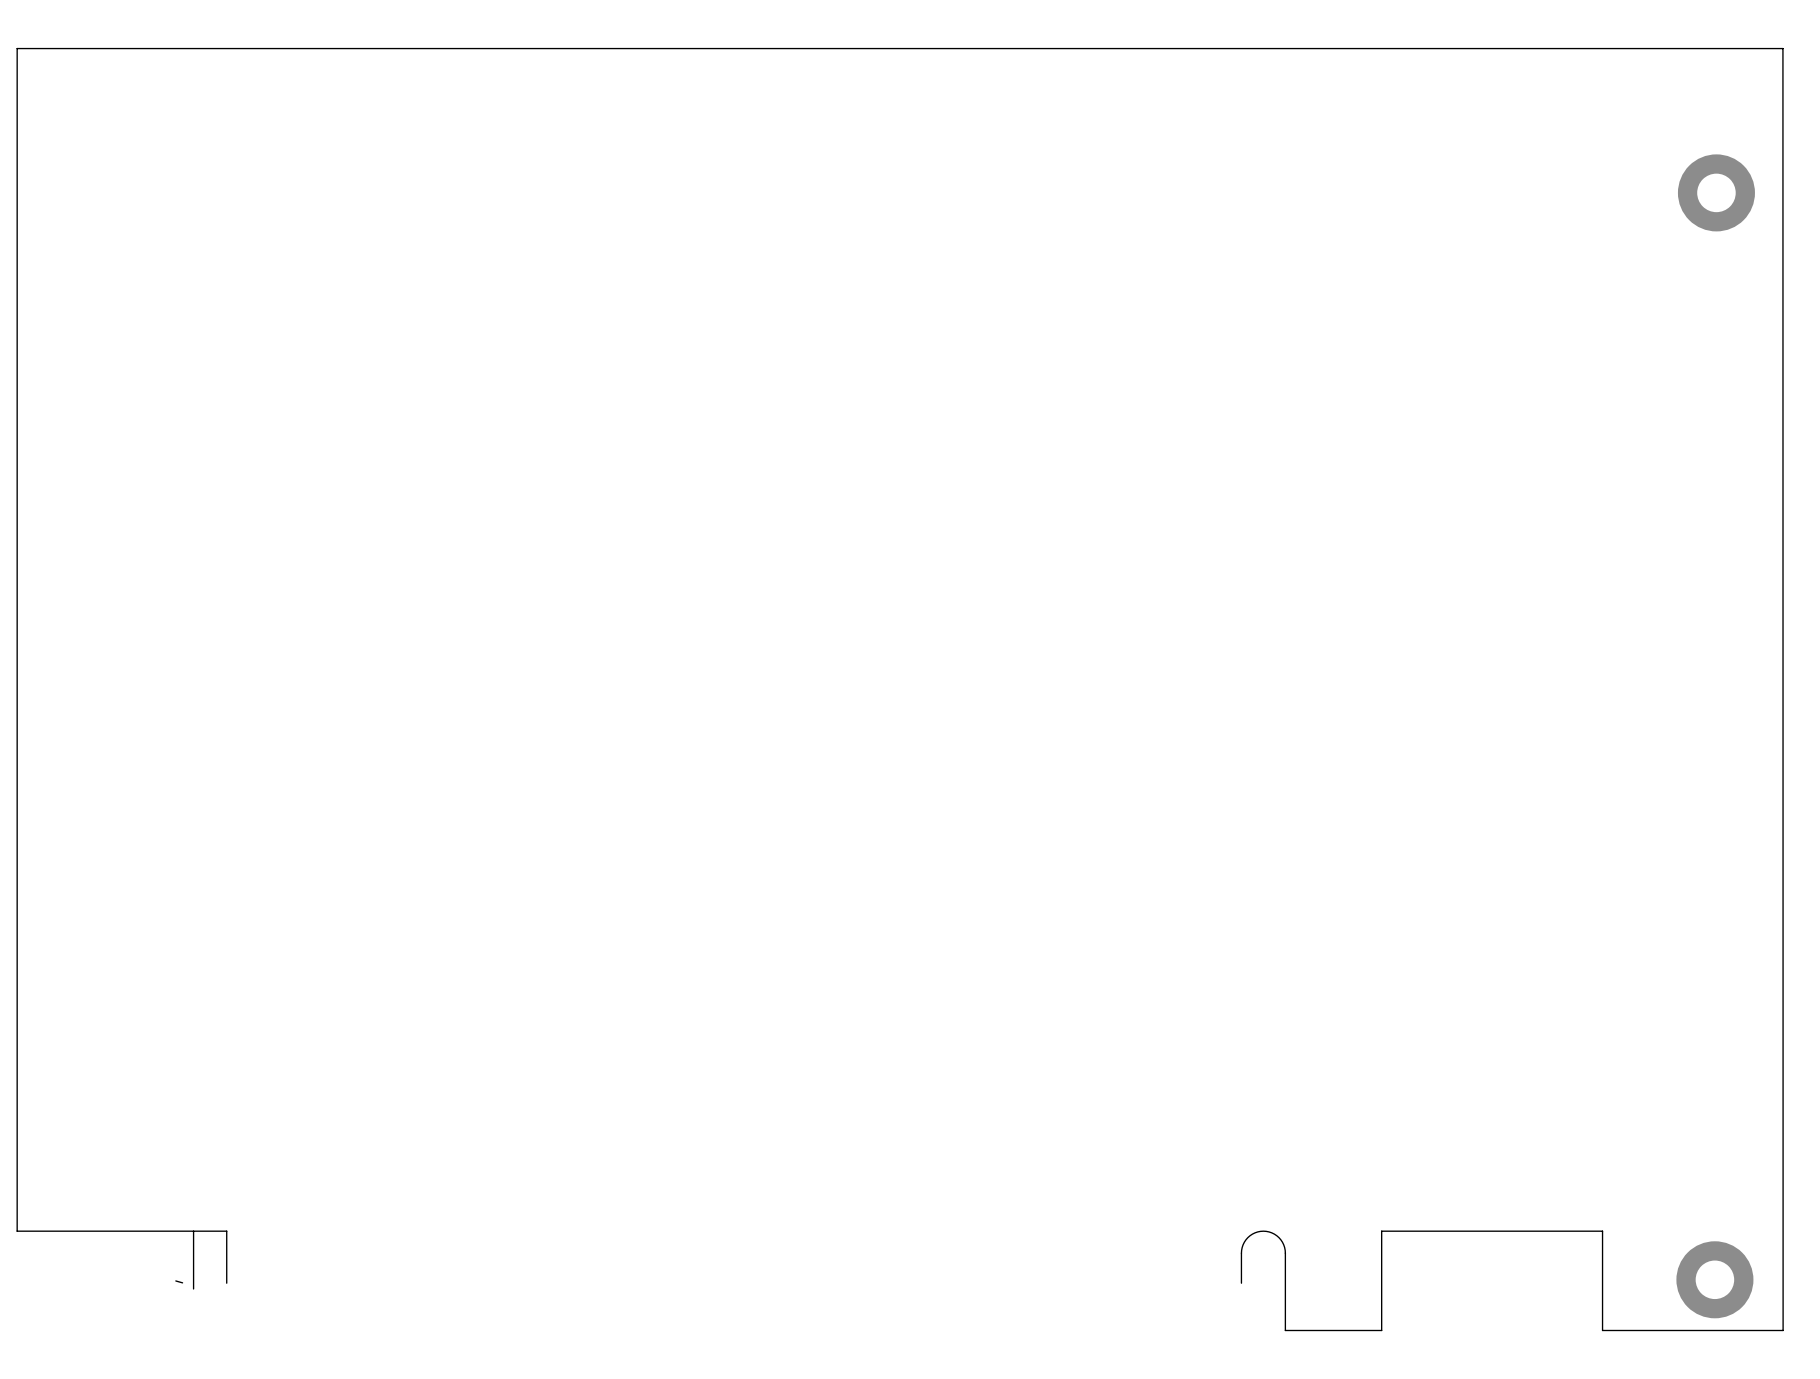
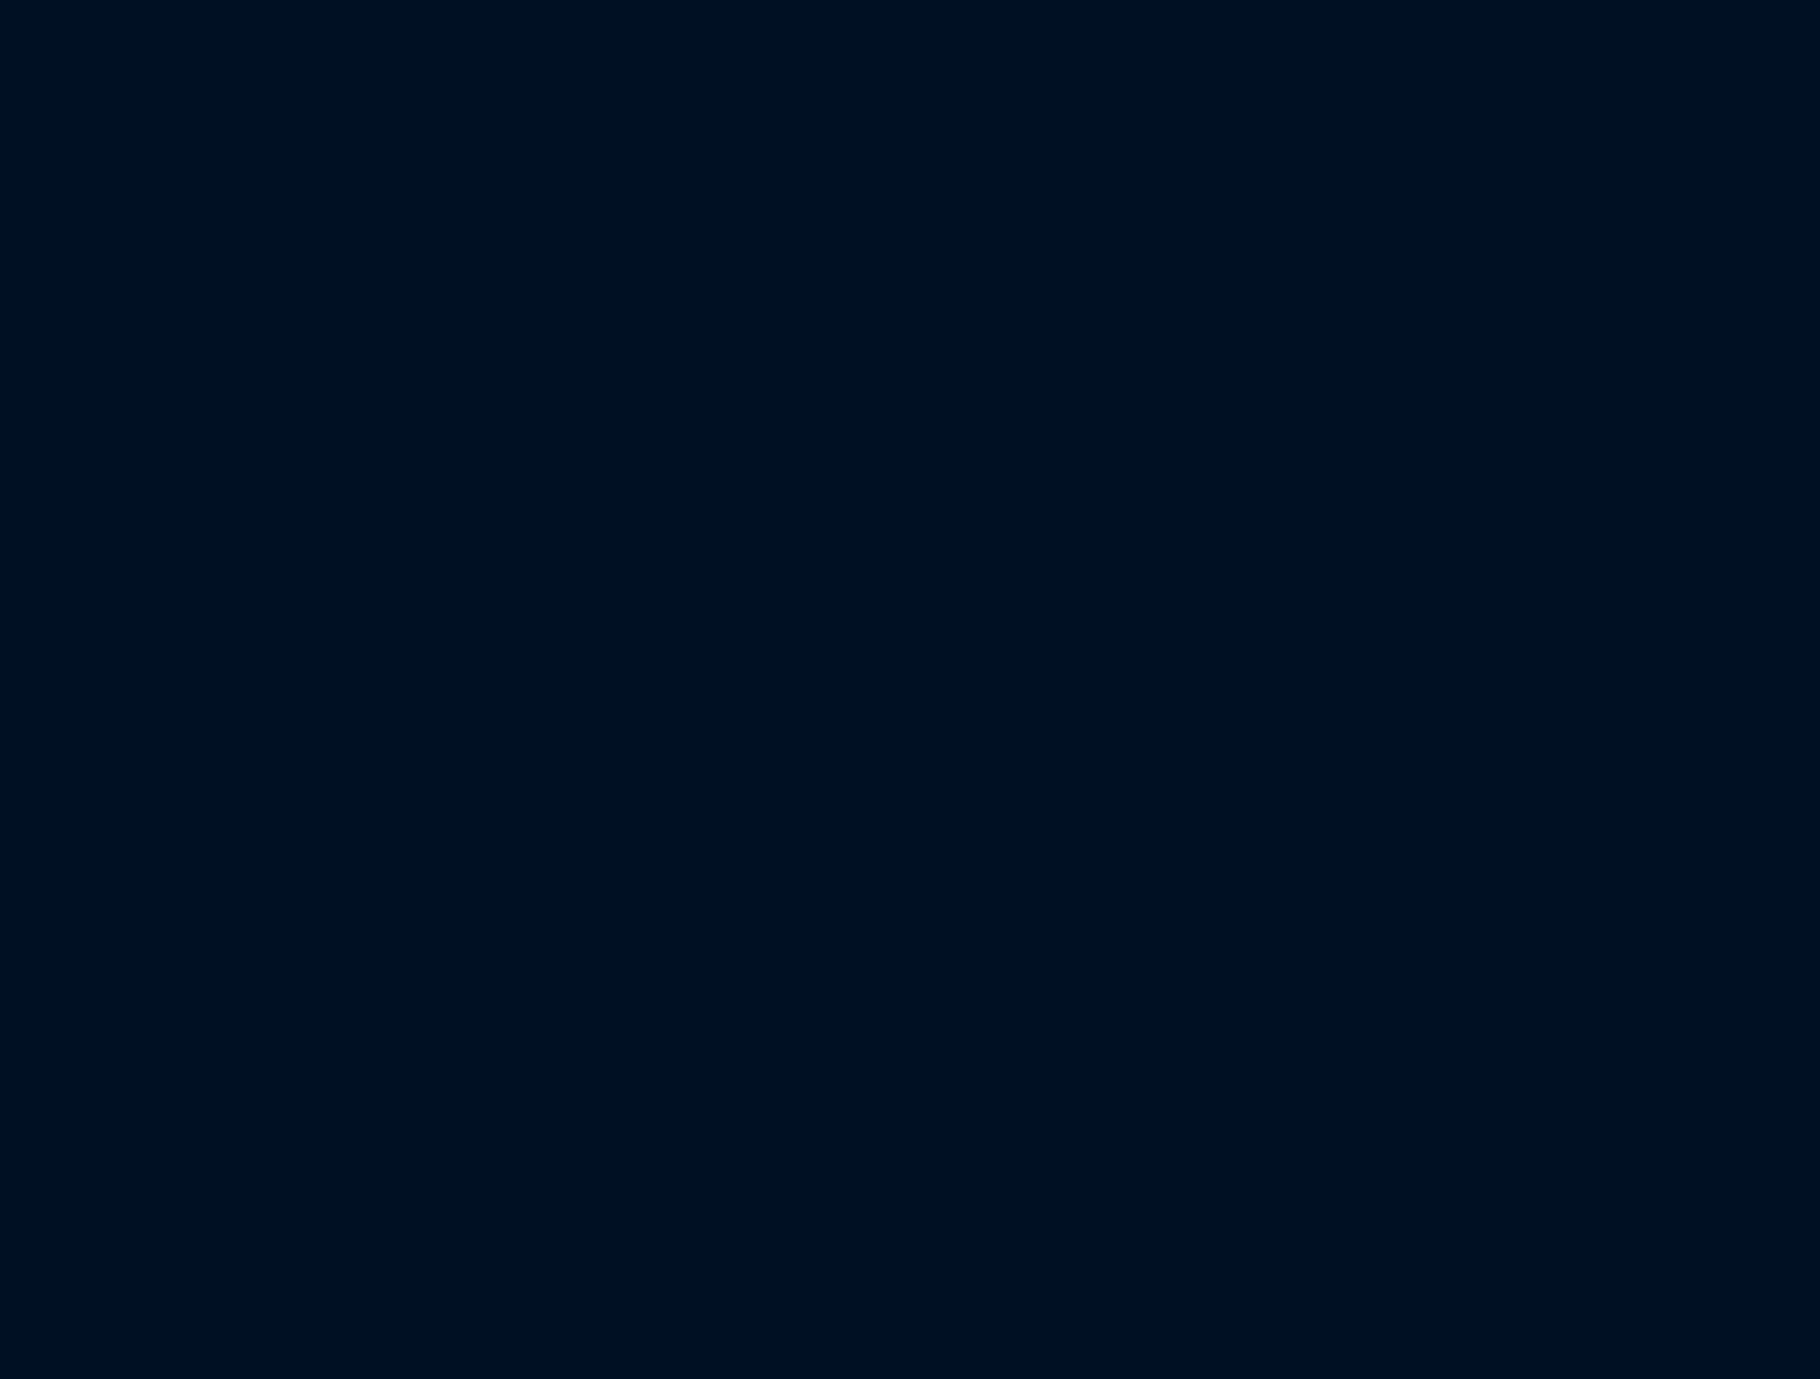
part: (1716, 192) -> none
board edge: (193, 1231) (193, 1288) -> none
part: (1714, 1279) -> none
board edge: (175, 1280) (182, 1282) -> none
board edge: (1241, 1283) (1241, 1250) (1244, 1242) (1255, 1232) (1269, 1231) (1280, 1239) (1285, 1250) (1285, 1330) (1381, 1330) (1381, 1231) (1602, 1231) (1602, 1330) (1783, 1330) (1782, 48) (17, 48) (17, 1231) (226, 1231) (226, 1283) -> none

